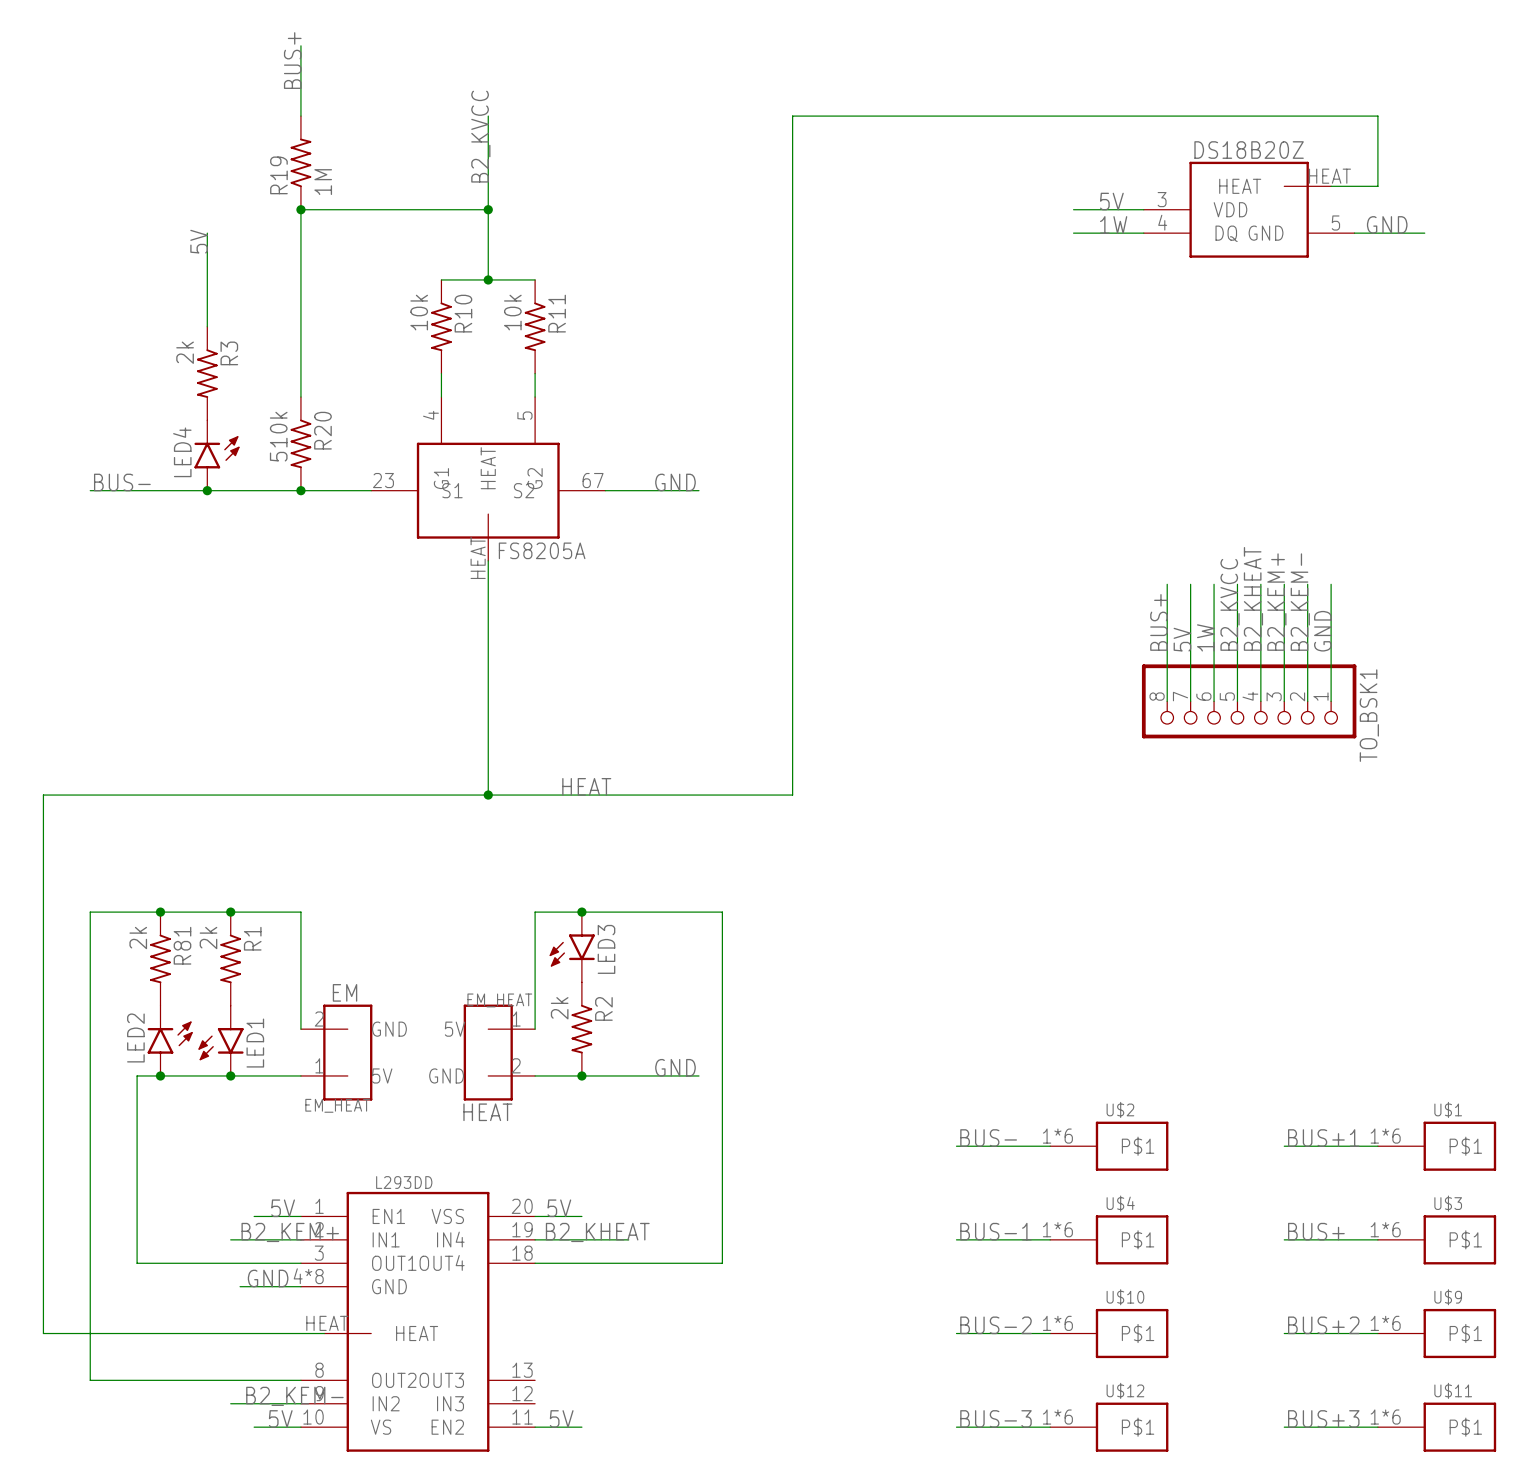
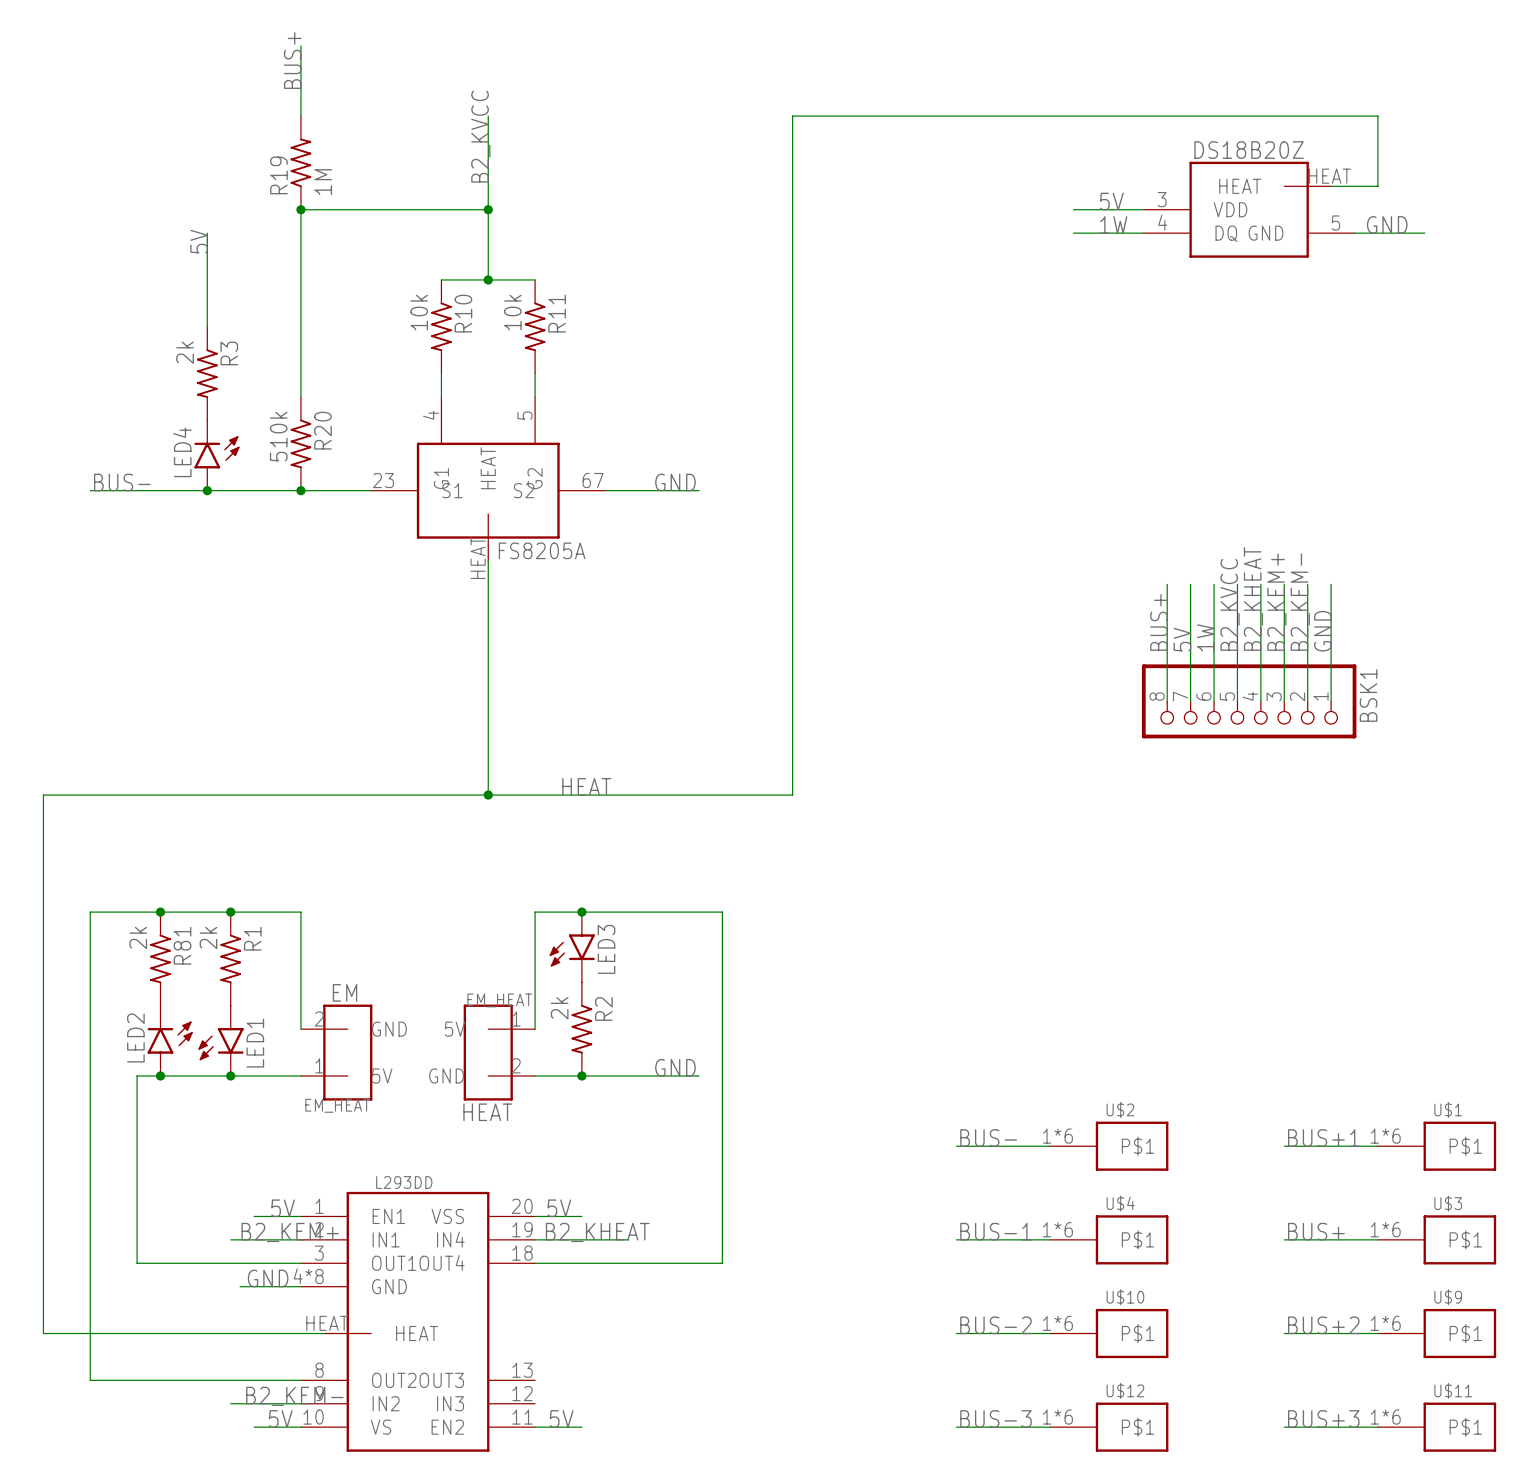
TO_BSK1 name: TO_BSK1 (1369, 715) -> BSK1 (1368, 695)

